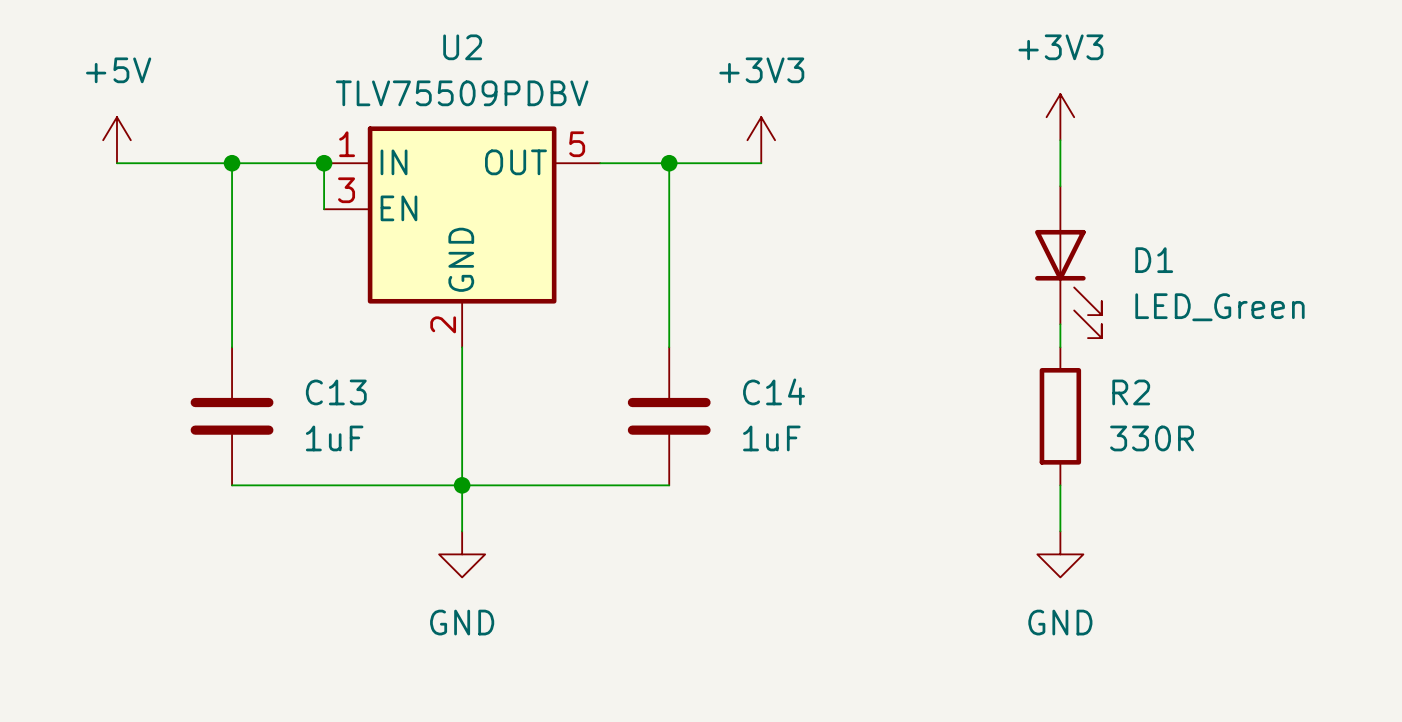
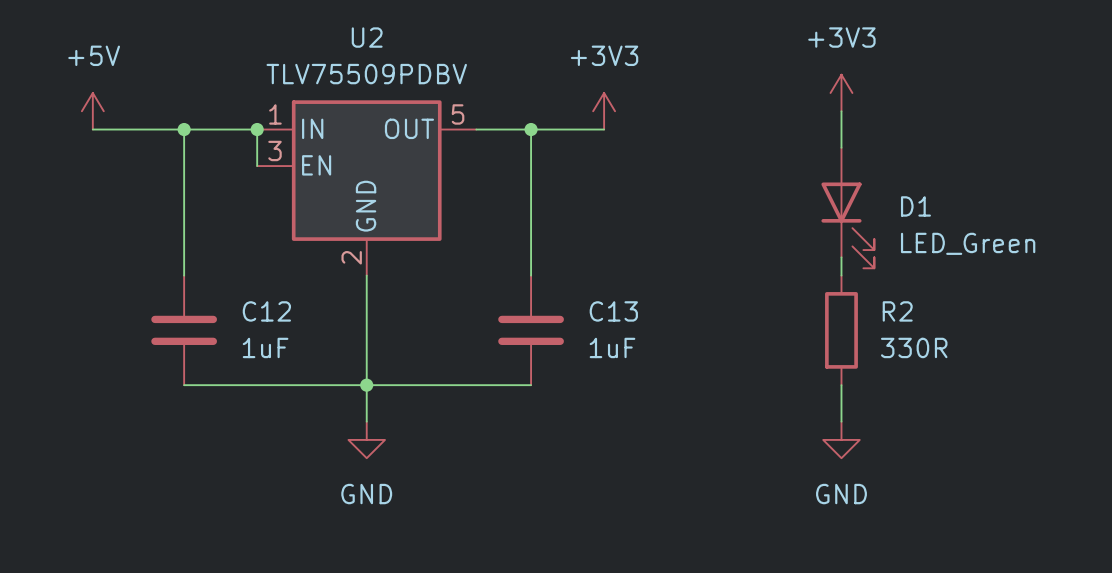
C14 name: C14 (774, 391) -> C13 (613, 311)
C13 name: C13 (336, 392) -> C12 (266, 311)

